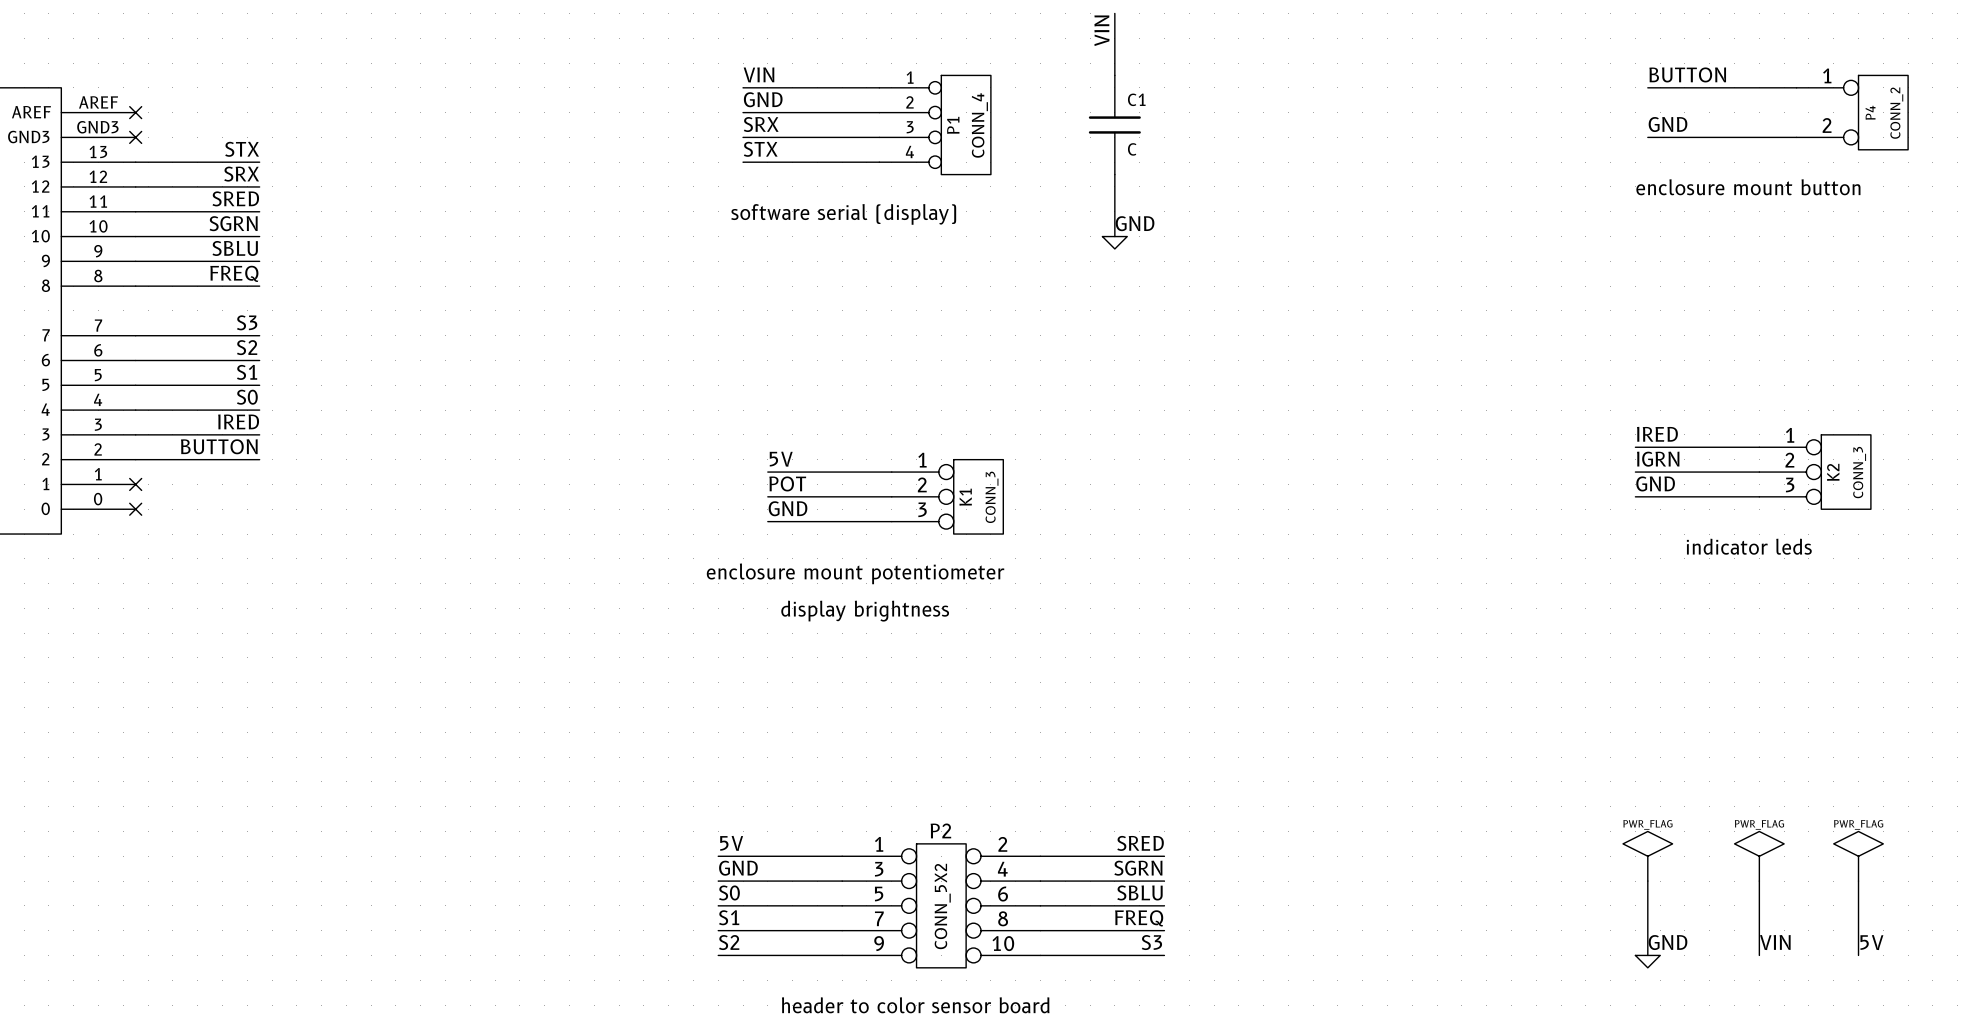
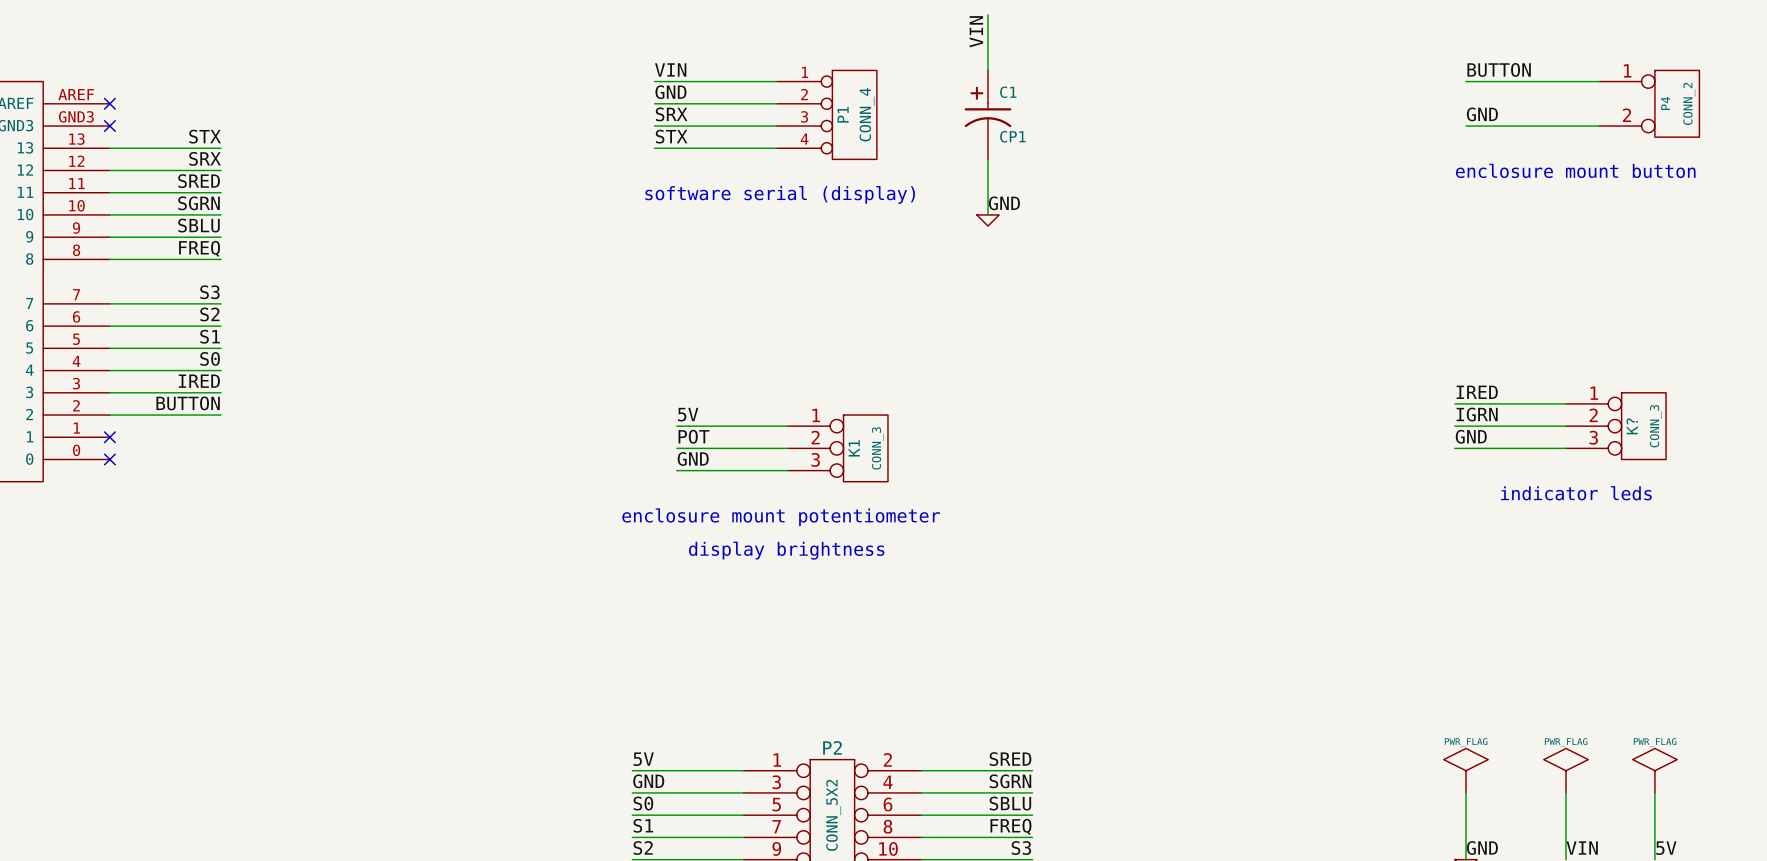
C1 symbol: [1088, 75, 1141, 175] -> [964, 70, 1012, 160]
C1 value: C (1132, 149) -> CP1 (1012, 136)
K2 name: K2 (1833, 472) -> K? (1632, 426)

